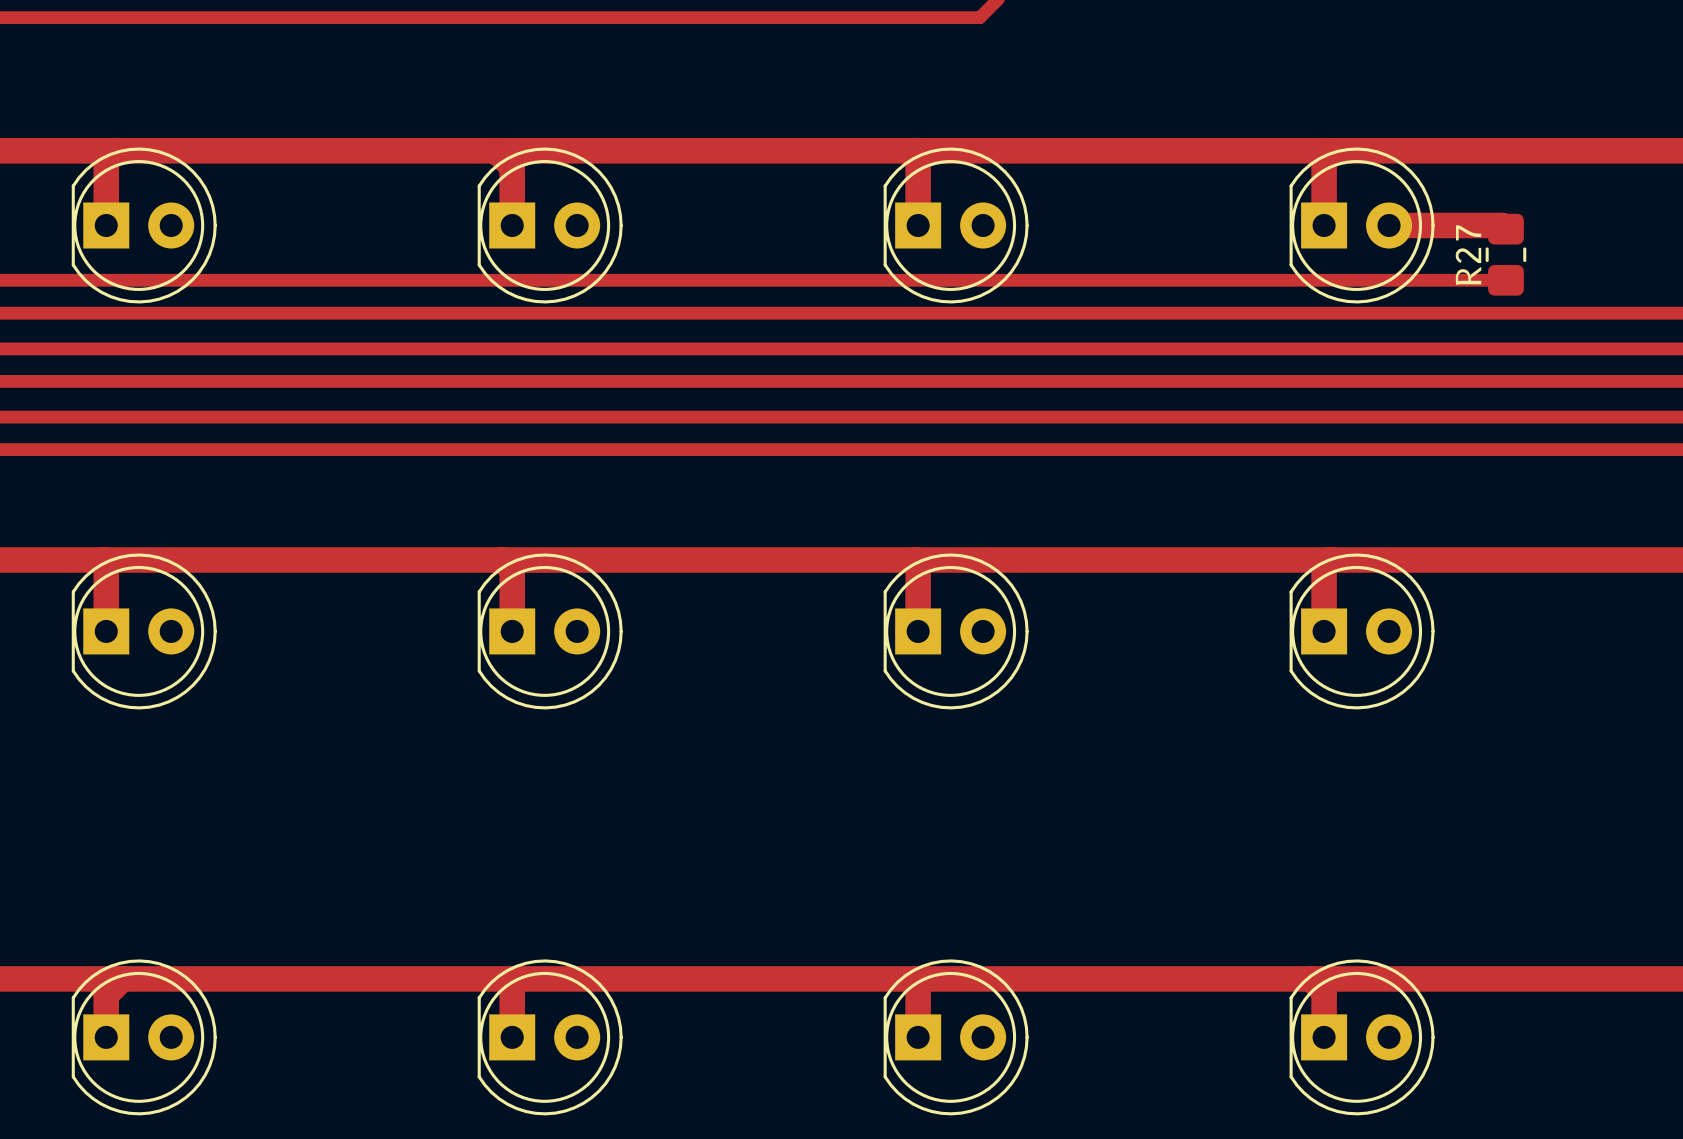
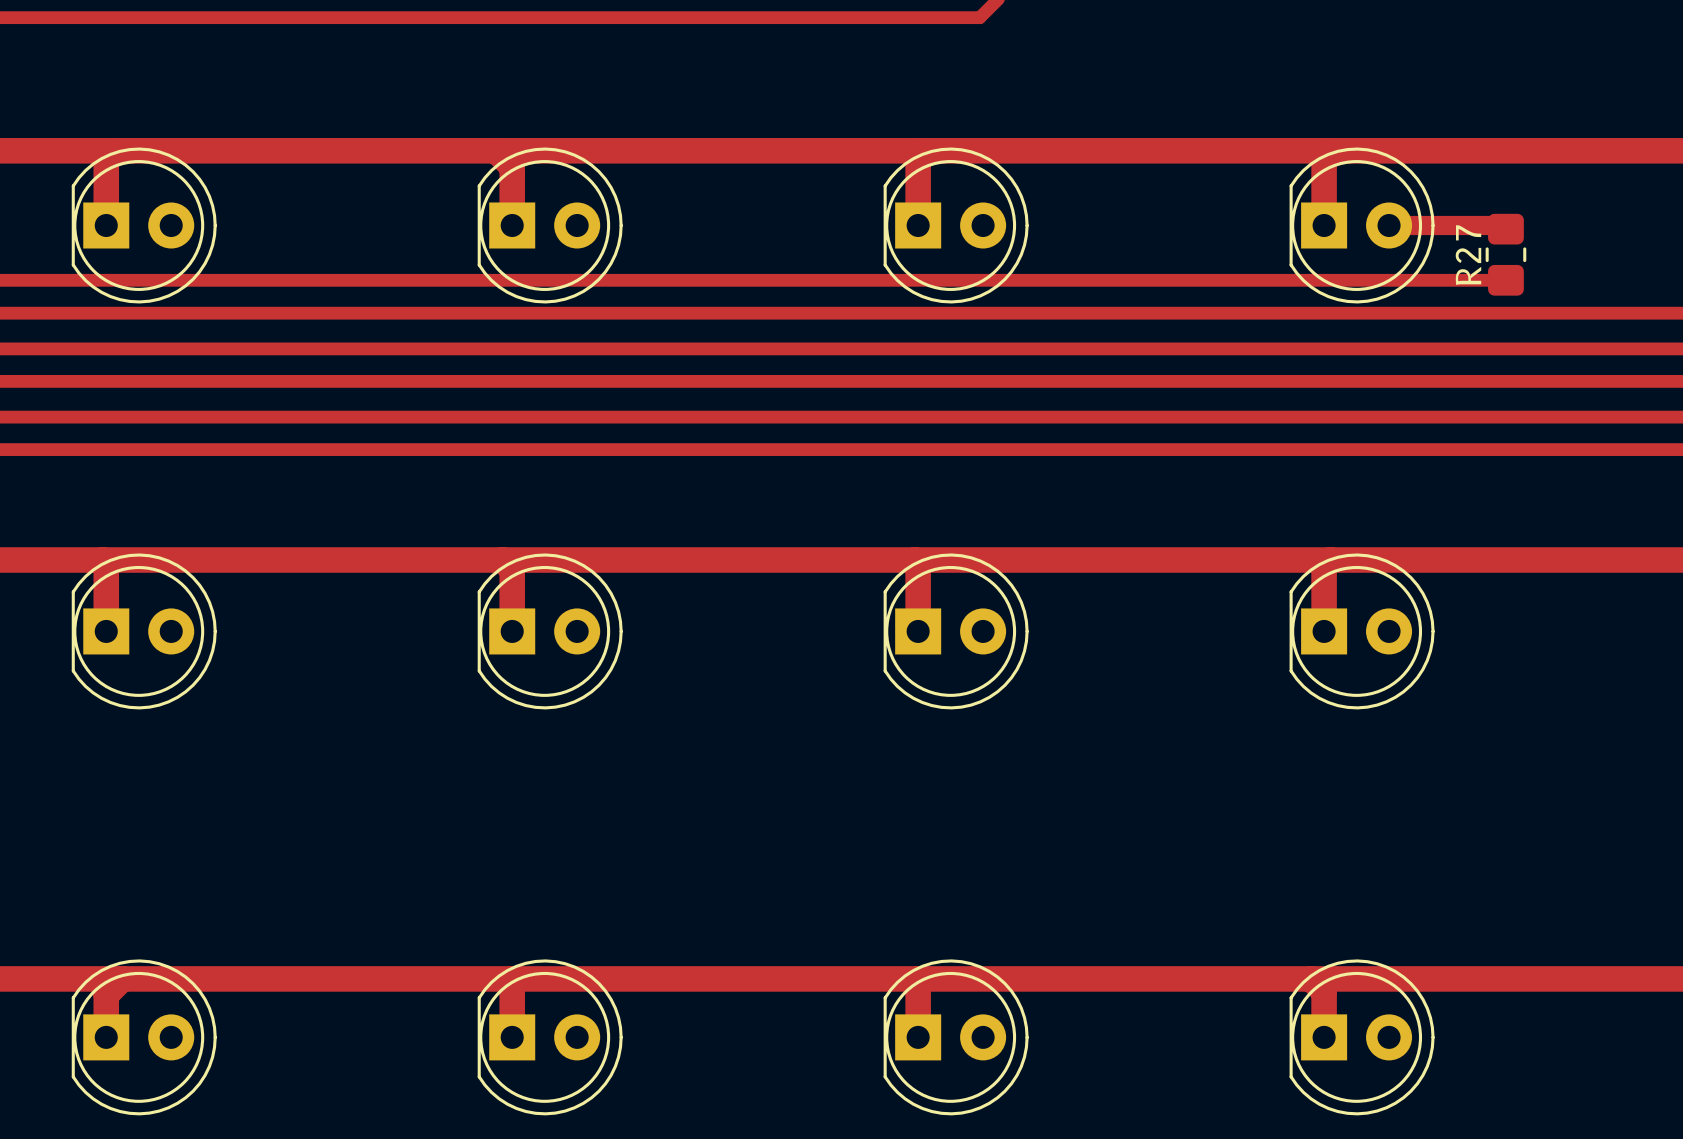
track width: thick (1389, 225) (1502, 225) (1505, 229) -> thin (1389, 225) (1502, 225) (1505, 229)

